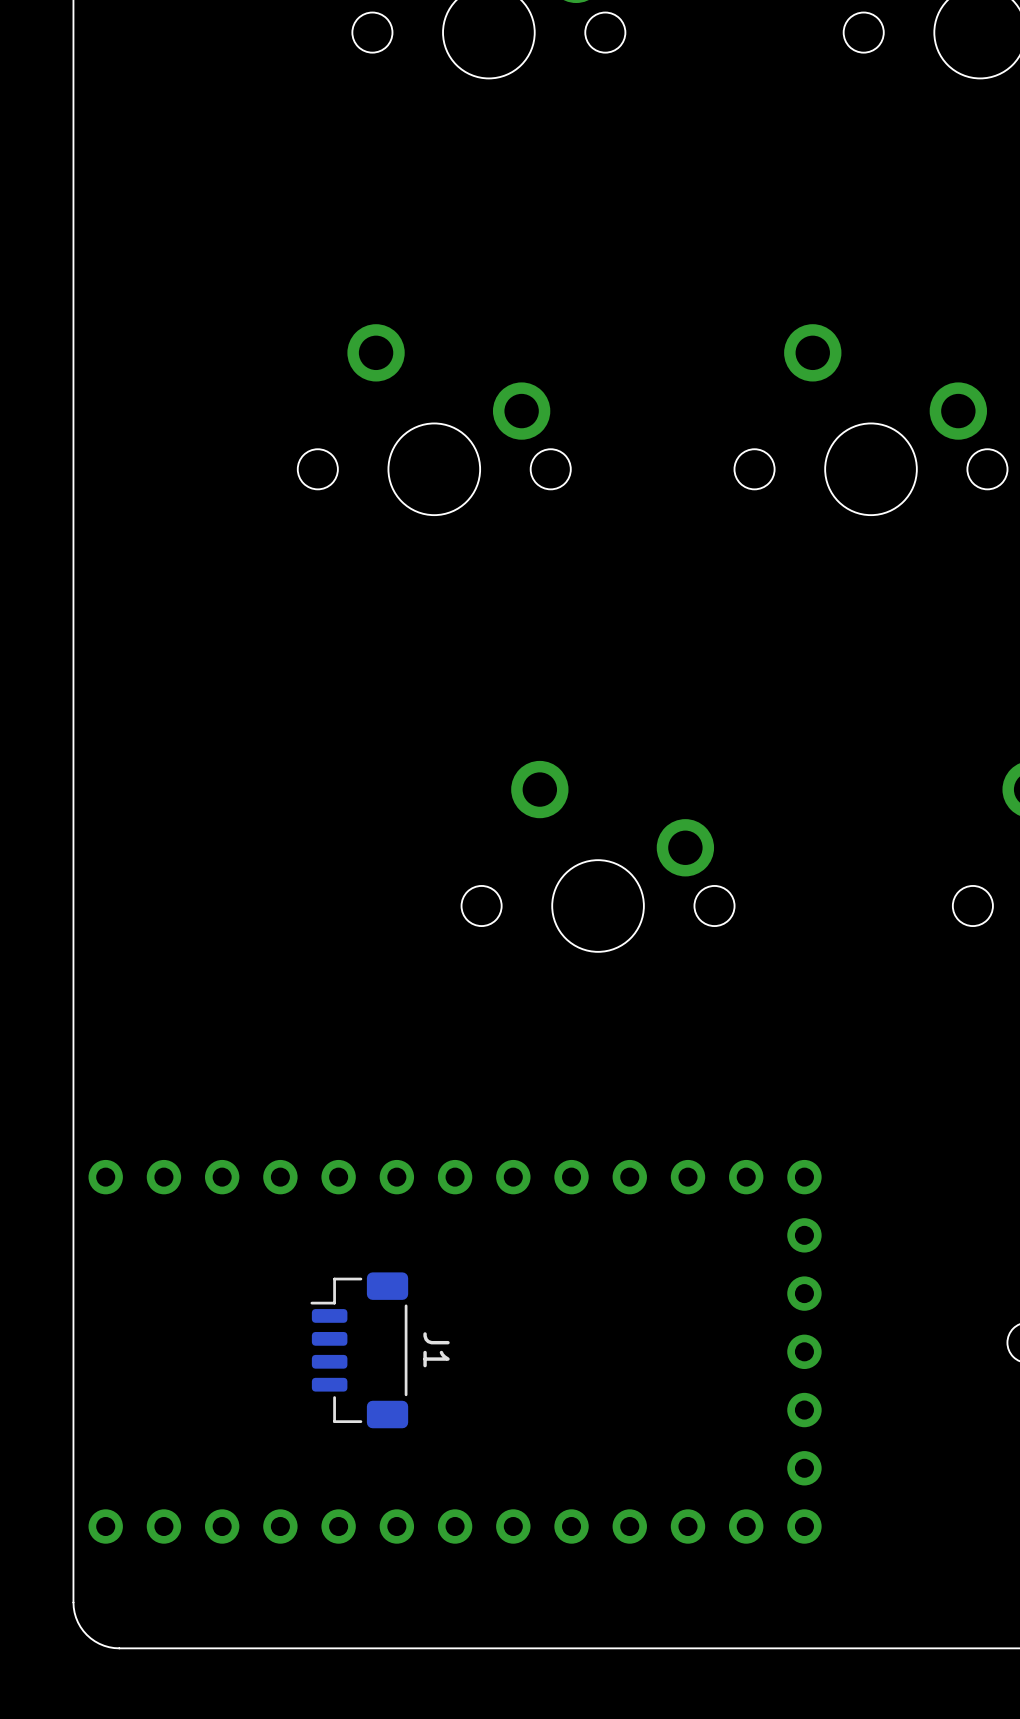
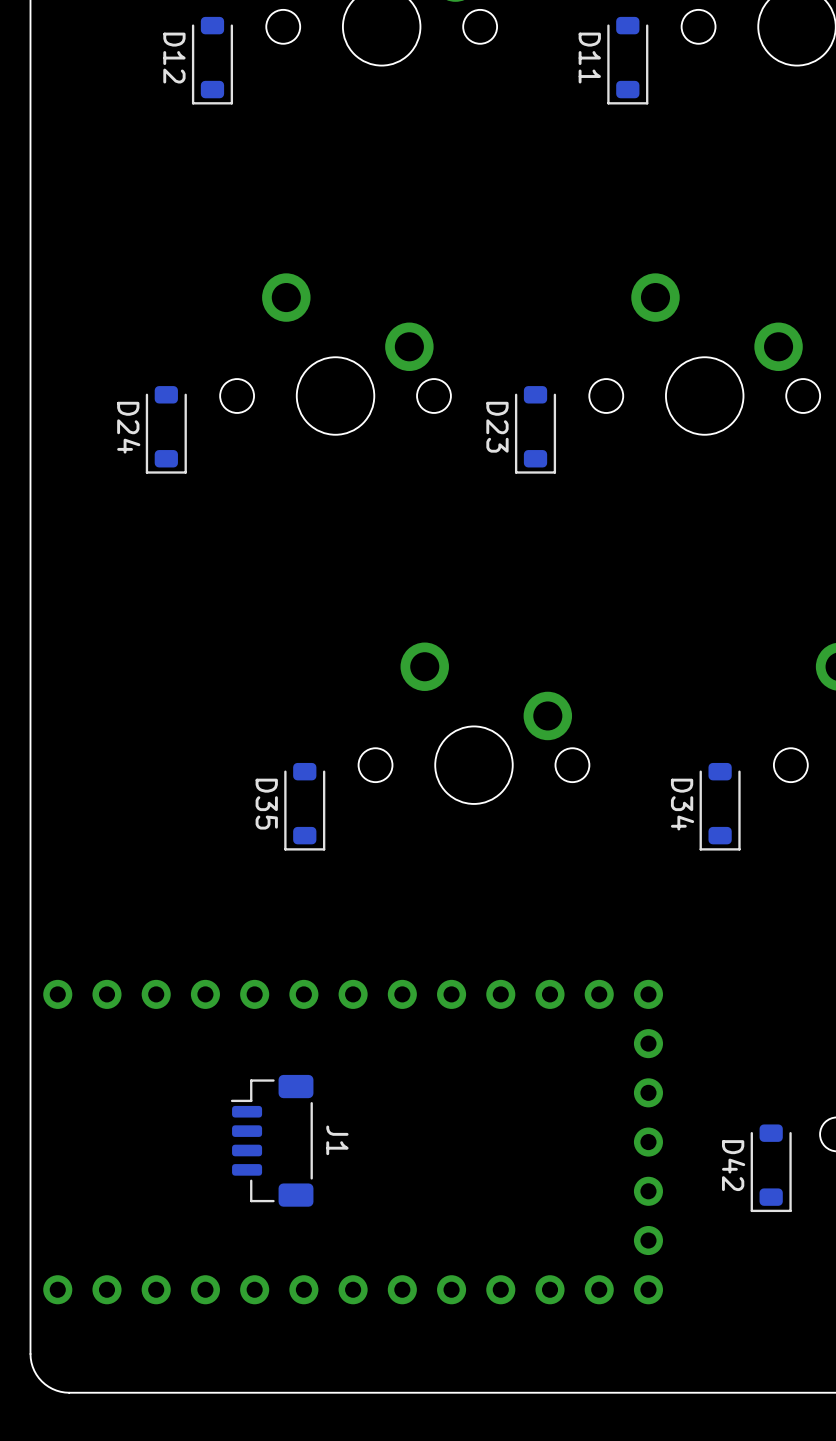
D12: none -> (212, 60)
D11: none -> (627, 60)
D24: none -> (166, 429)
D23: none -> (535, 429)
D35: none -> (304, 806)
D34: none -> (720, 806)
D42: none -> (771, 1168)

